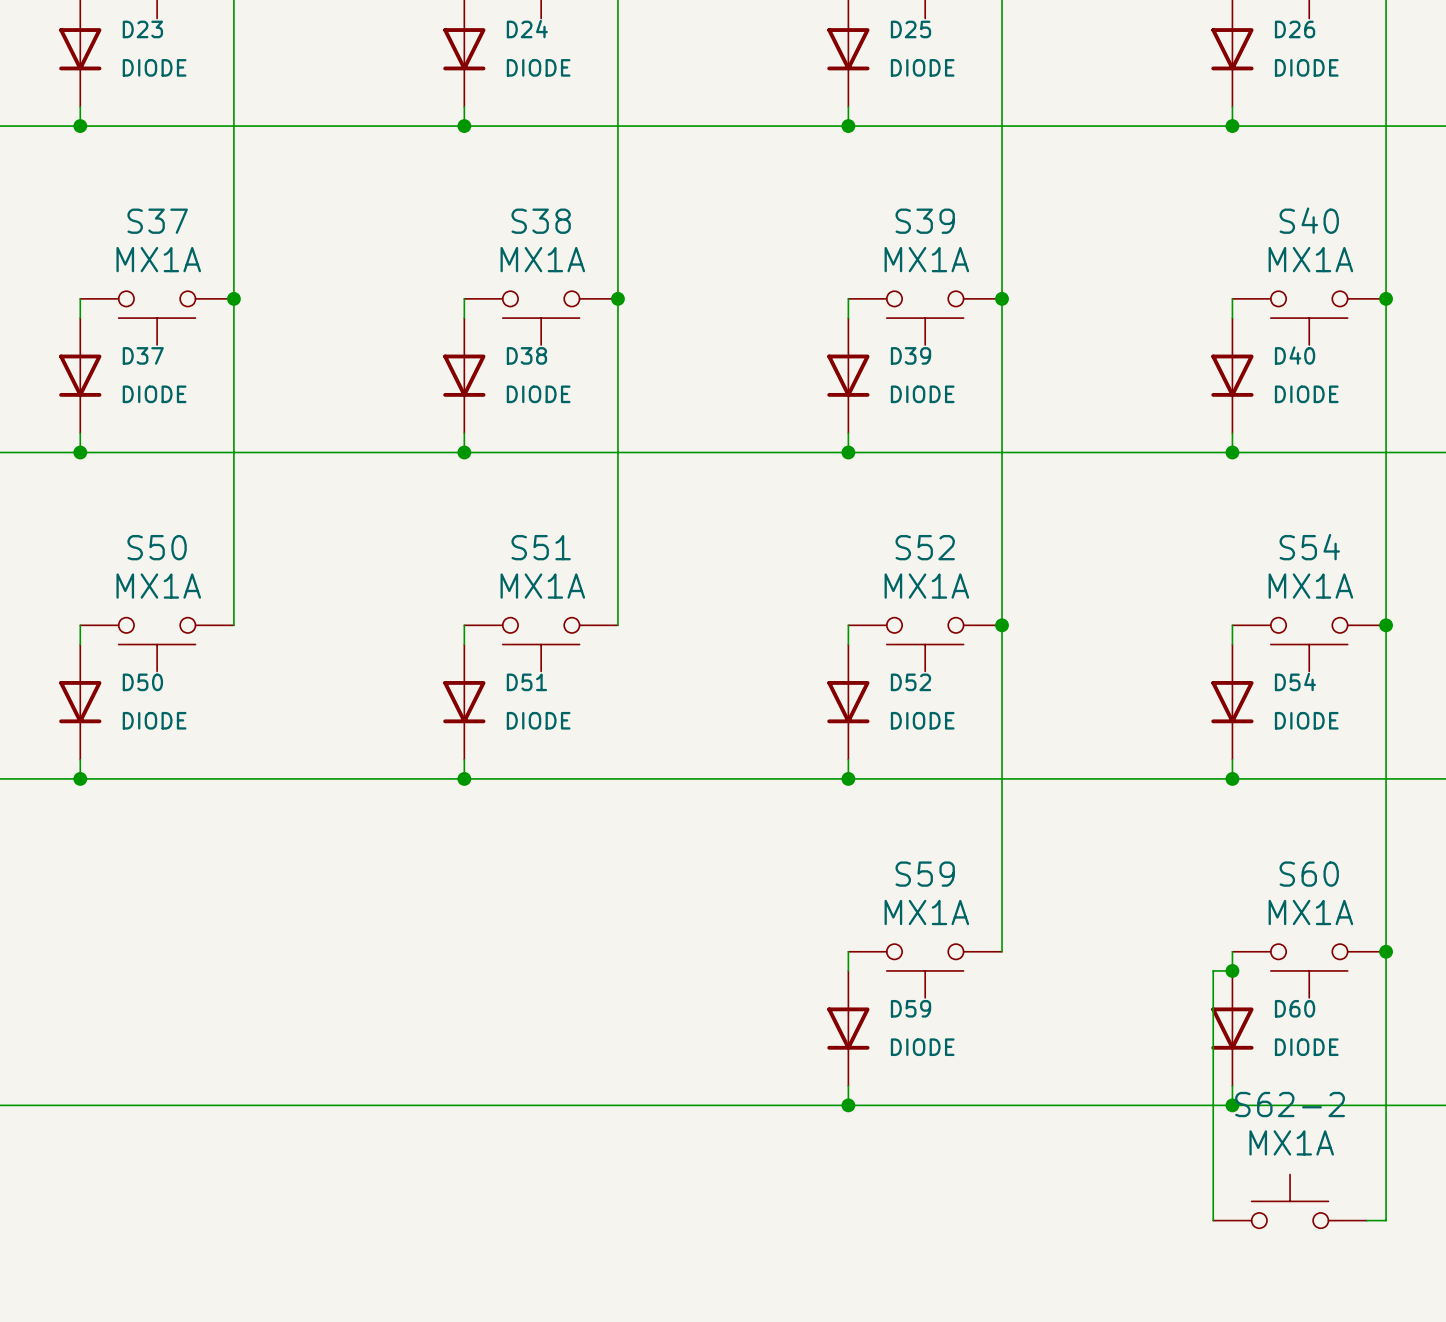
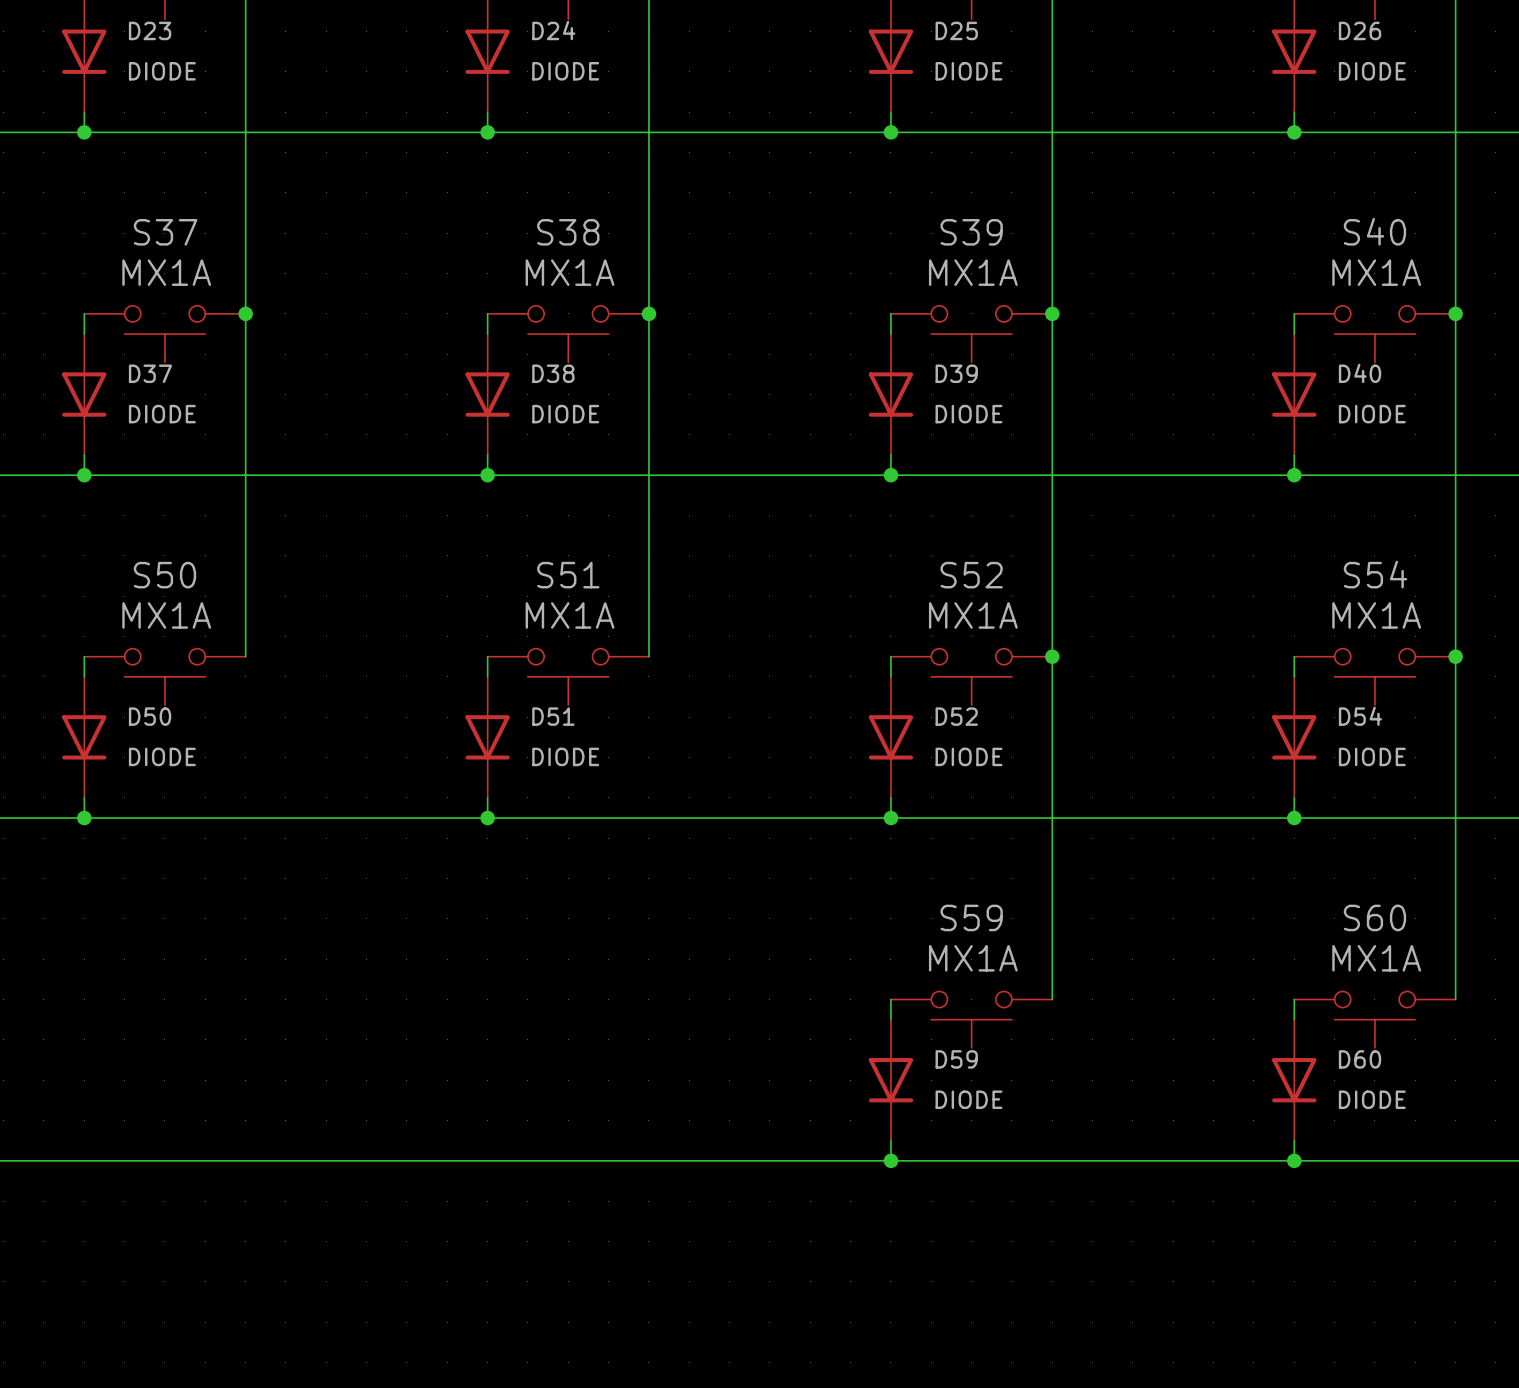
wire: (1386, 951) (1386, 1220) (1366, 1220) -> none
junction: (1386, 951) -> none
wire: (1232, 970) (1213, 970) (1213, 1220) -> none
junction: (1232, 970) -> none
S62-2: MX1A (1290, 1201) -> none

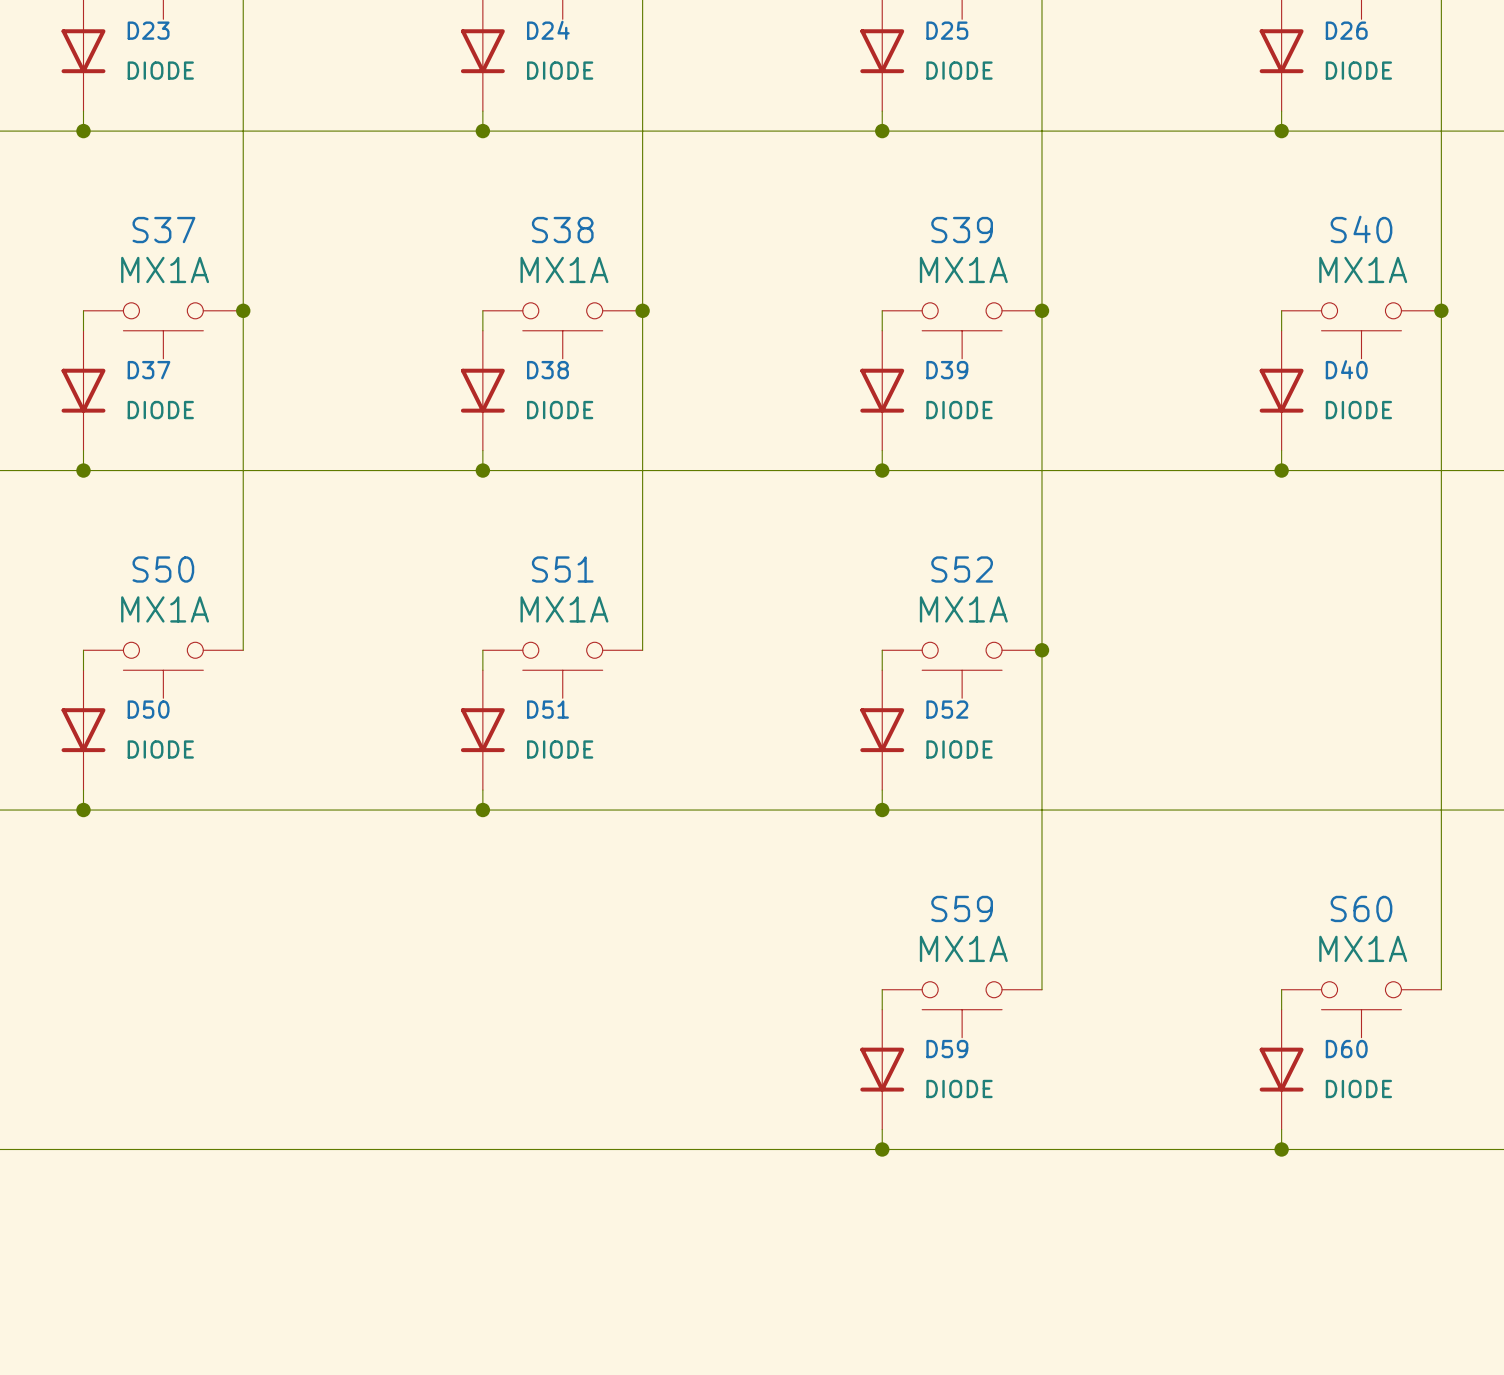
wire: (1294, 656) (1294, 676) -> none
junction: (1455, 656) -> none
S54: MX1A (1374, 676) -> none
D54: DIODE (1294, 737) -> none
wire: (1294, 797) (1294, 818) -> none
junction: (1294, 818) -> none

